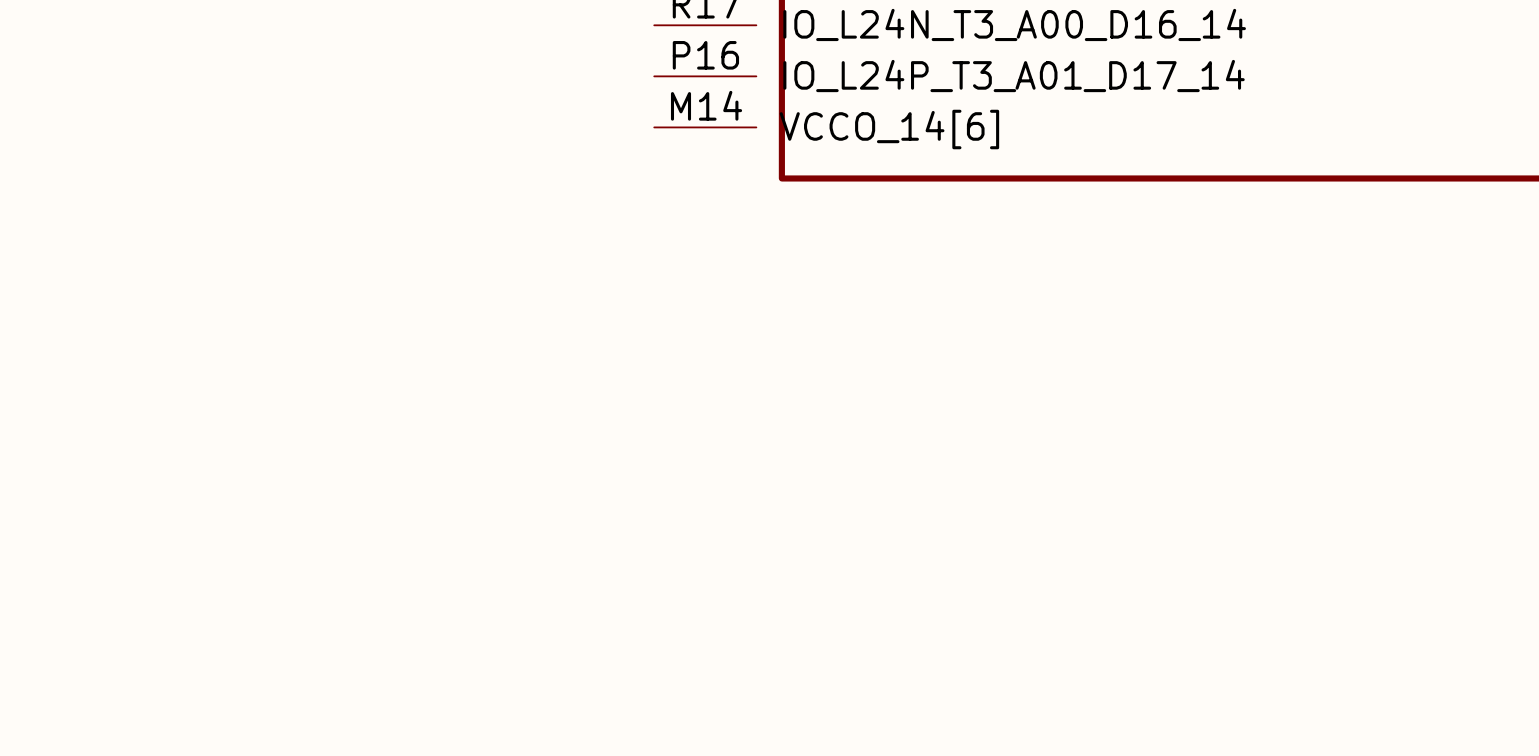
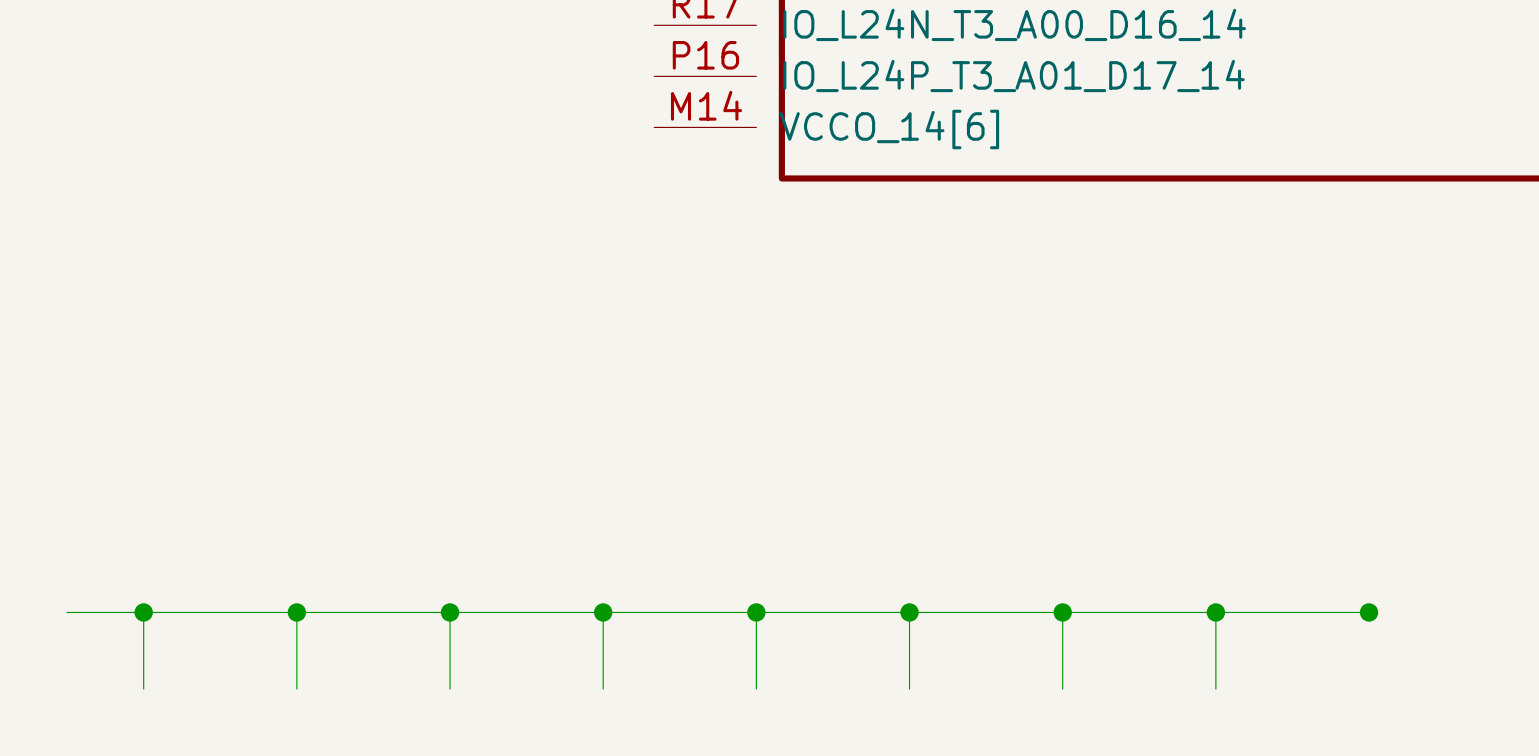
wire: none -> (67, 612) (1369, 612)
wire: none -> (143, 612) (143, 689)
junction: none -> (143, 612)
wire: none -> (296, 612) (296, 689)
junction: none -> (296, 612)
wire: none -> (450, 612) (450, 689)
junction: none -> (450, 612)
wire: none -> (603, 612) (603, 689)
junction: none -> (603, 612)
wire: none -> (756, 612) (756, 689)
junction: none -> (756, 612)
wire: none -> (909, 612) (909, 689)
junction: none -> (909, 612)
wire: none -> (1062, 612) (1062, 689)
junction: none -> (1062, 612)
wire: none -> (1215, 612) (1215, 689)
junction: none -> (1215, 612)
junction: none -> (1369, 612)

